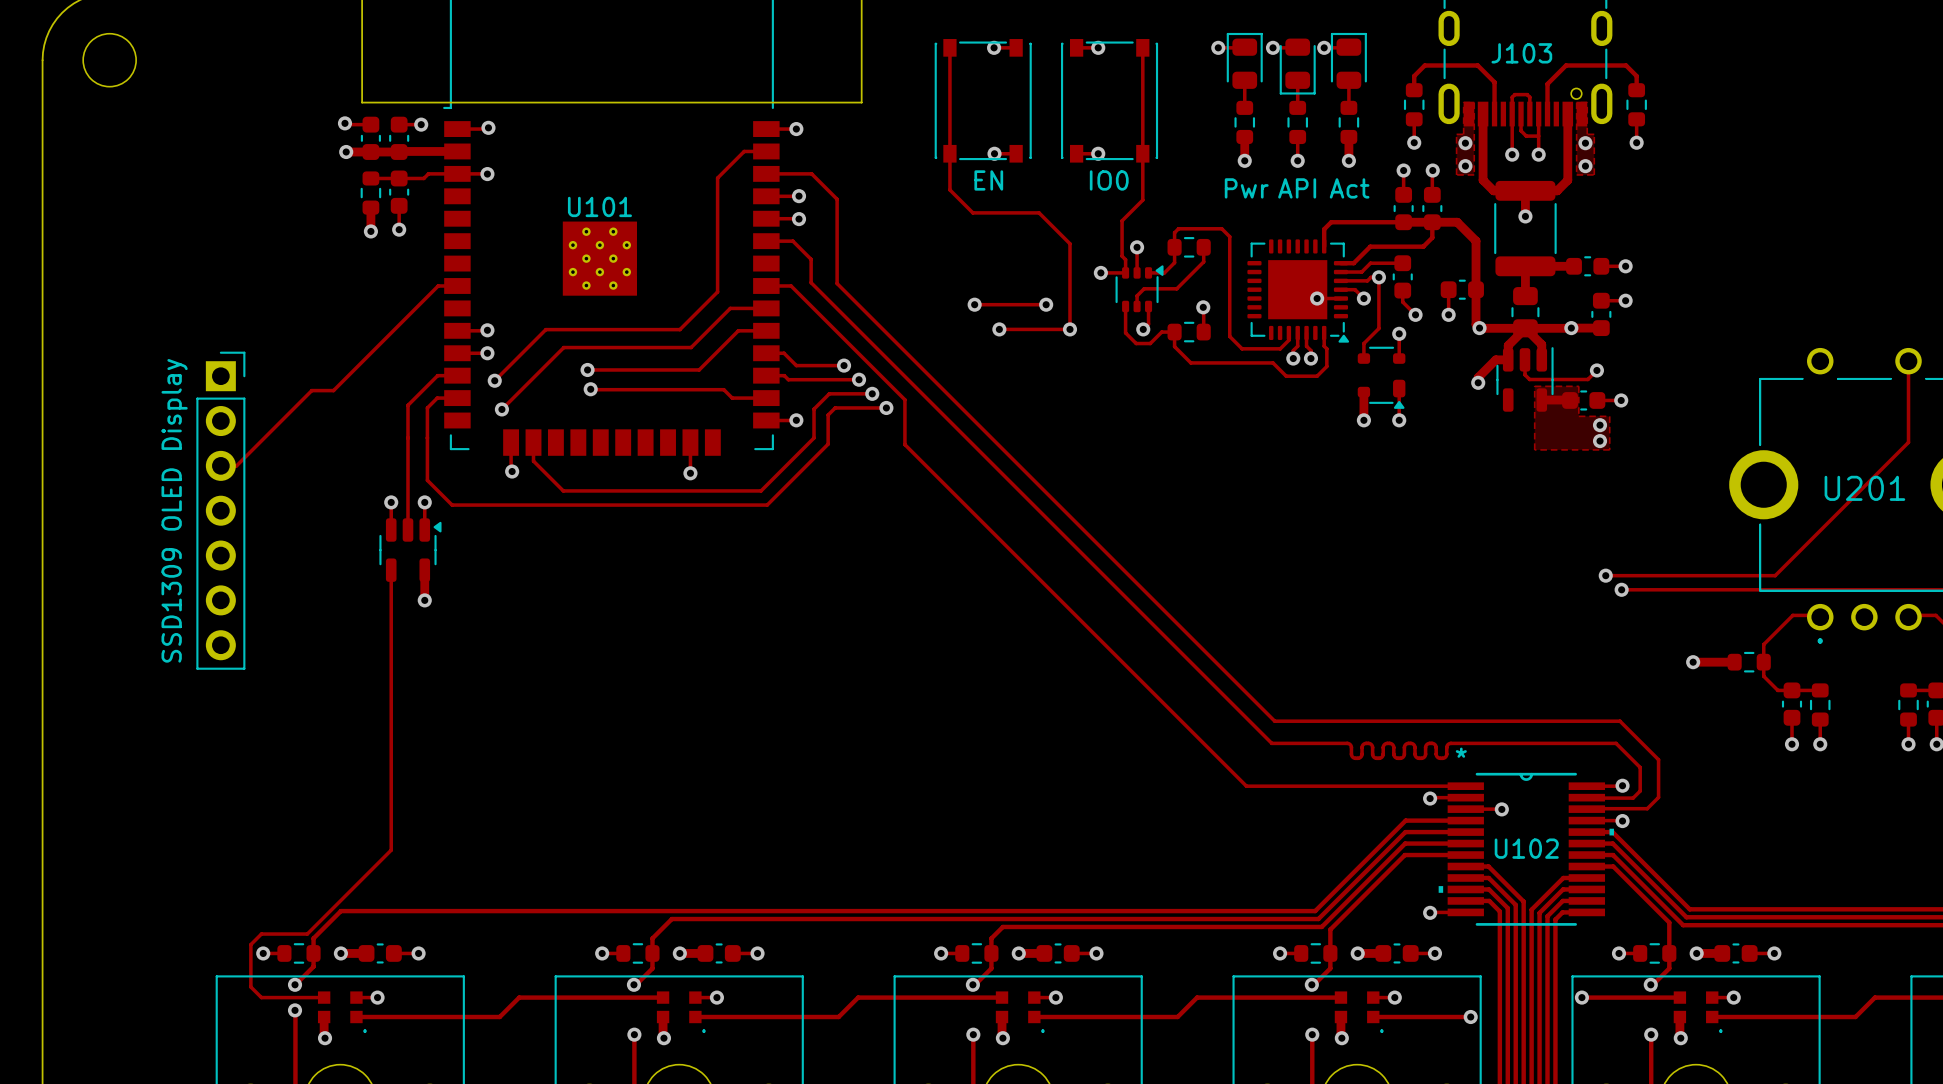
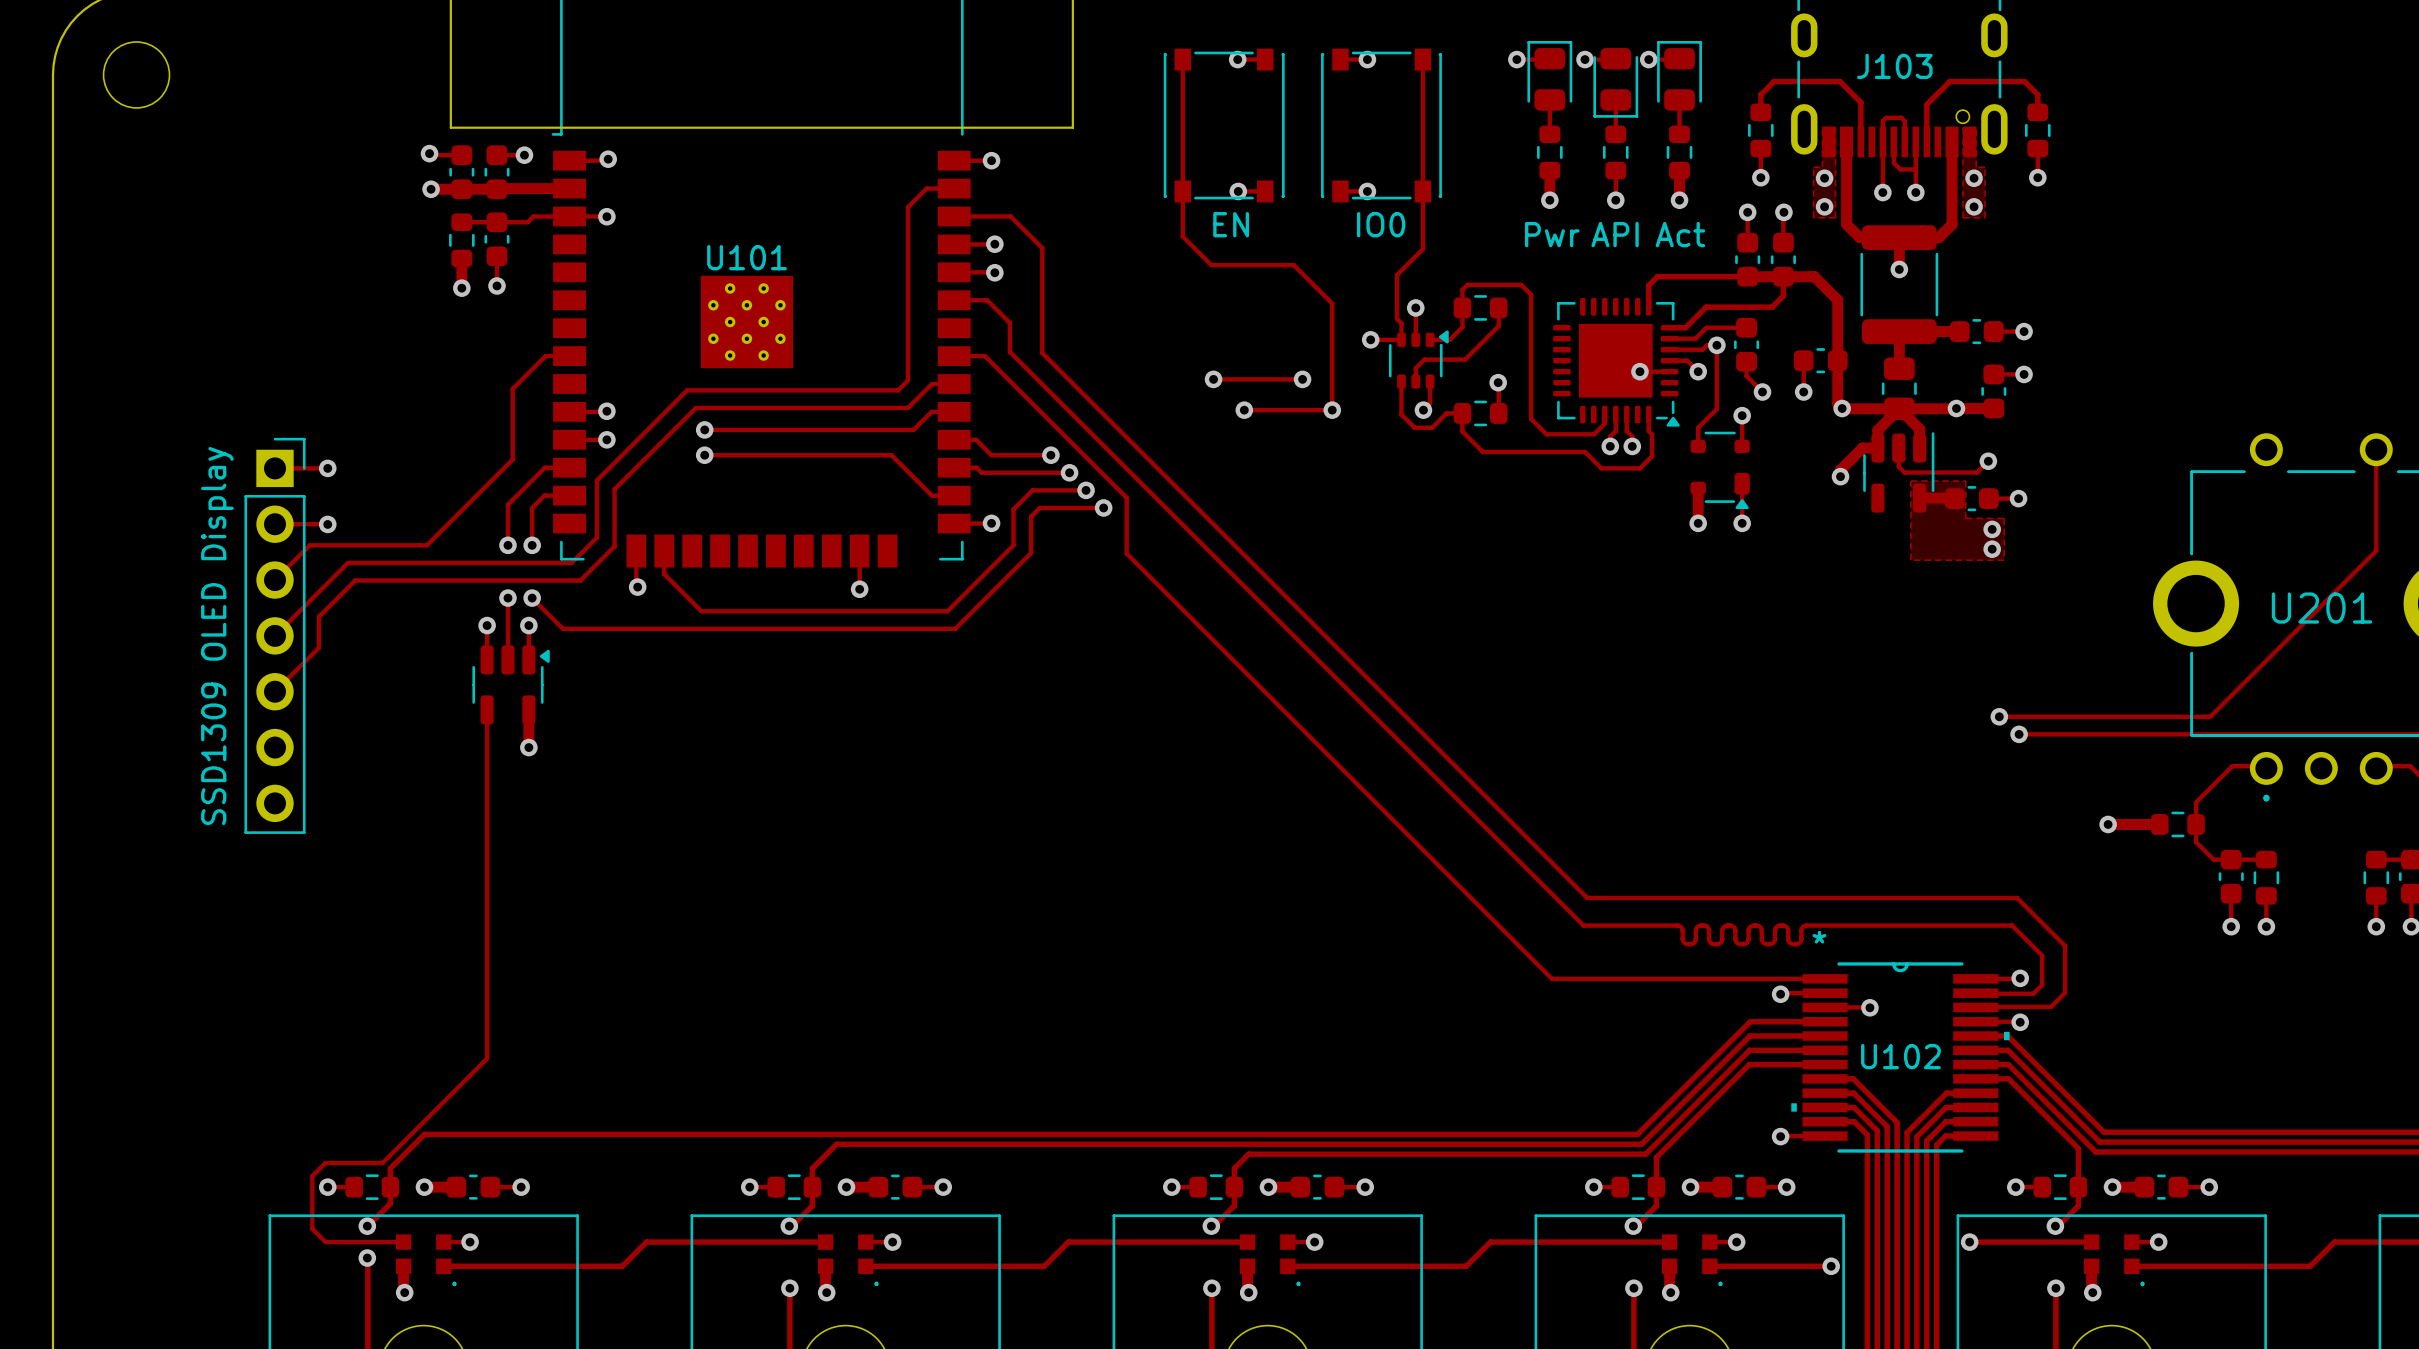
track: (729, 166) (717, 178) (717, 291) (679, 329) (545, 329) (494, 380) -> (908, 207) (908, 380) (898, 390) (687, 390) (597, 480) (597, 537) (571, 562) (347, 562) (275, 635)
track: (748, 308) (730, 308) (691, 347) (563, 347) (501, 409) -> (931, 383) (908, 407) (695, 407) (614, 489) (614, 546) (580, 580) (355, 580) (318, 616) (318, 647) (275, 691)
track: (411, 312) (333, 390) (311, 390) (236, 465) (220, 465) -> (512, 388) (512, 459) (426, 545) (309, 545) (275, 580)
track: (748, 330) (738, 330) (699, 369) (587, 369) -> (931, 411) (913, 429) (704, 429)
via: none -> (704, 429)
via: none -> (704, 455)
via: (587, 369) -> none
track: none -> (275, 468) (327, 468)
via: none -> (327, 468)
via: (494, 380) -> none
track: (590, 389) (723, 389) (732, 398) (748, 398) -> (704, 455) (891, 455) (931, 495)
via: (590, 389) -> none
via: (501, 409) -> none
track: none -> (275, 524) (327, 524)
via: none -> (327, 524)
track: (407, 437) (407, 480) -> none
via: none -> (507, 545)
via: none -> (532, 545)
via: none -> (507, 598)
via: none -> (532, 598)

